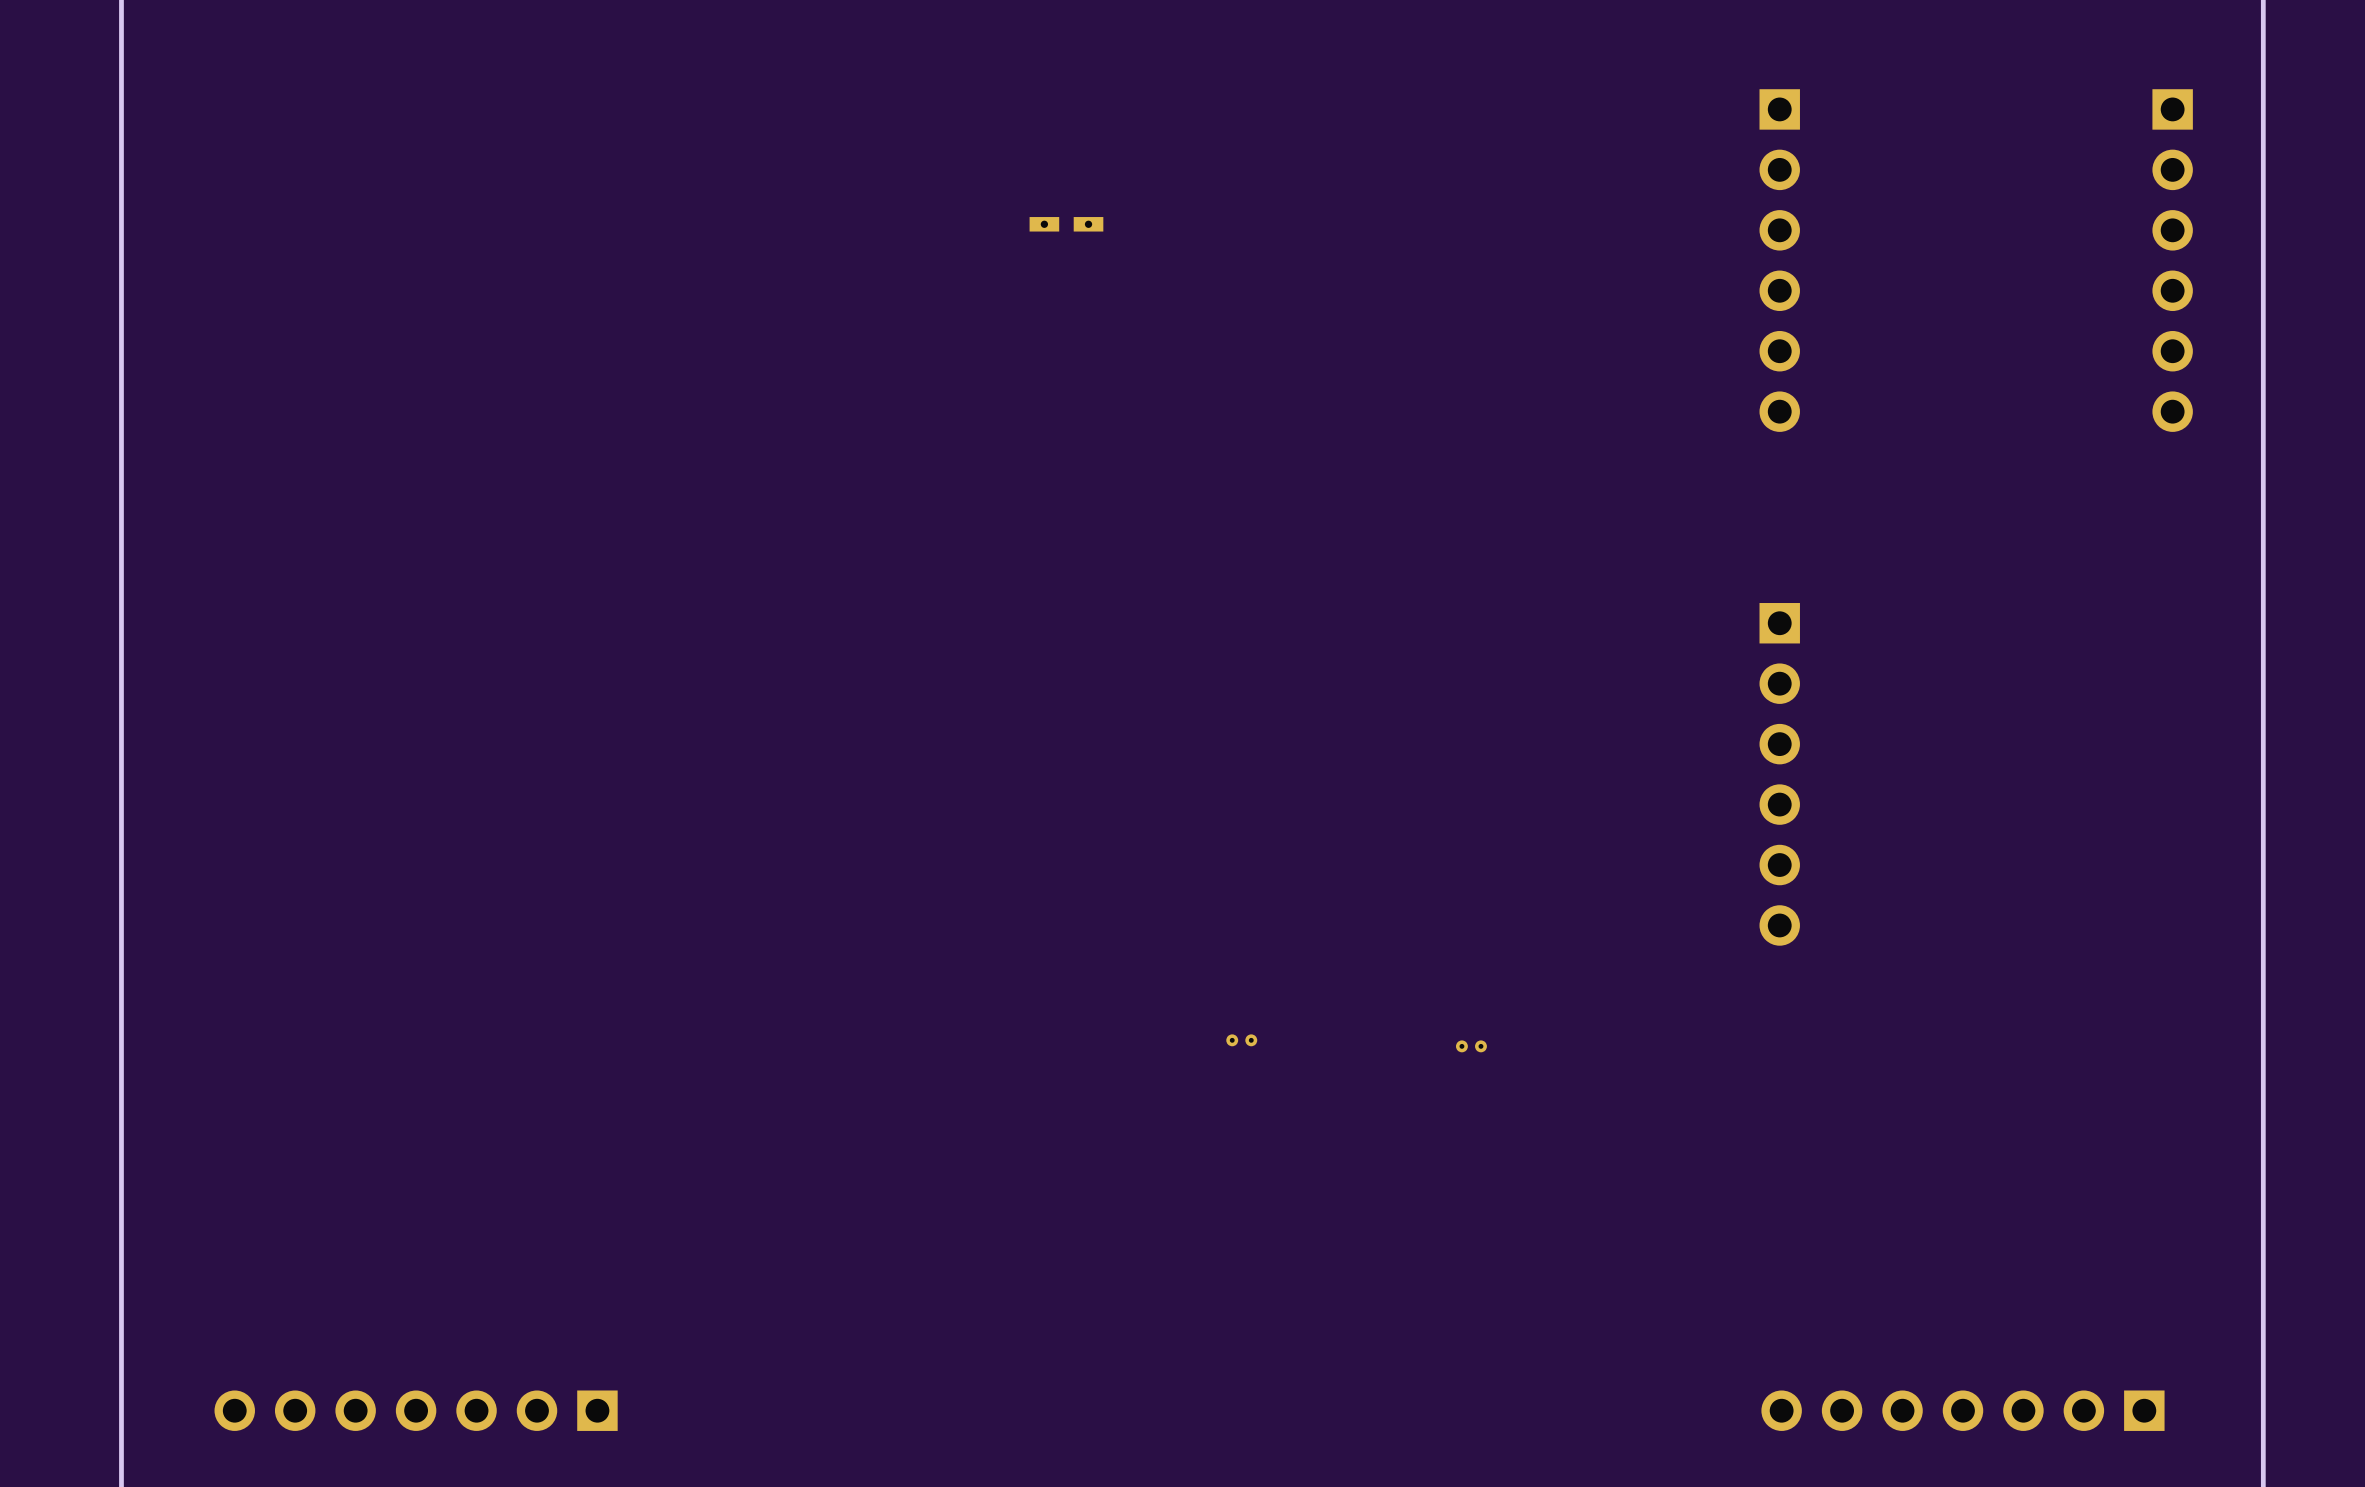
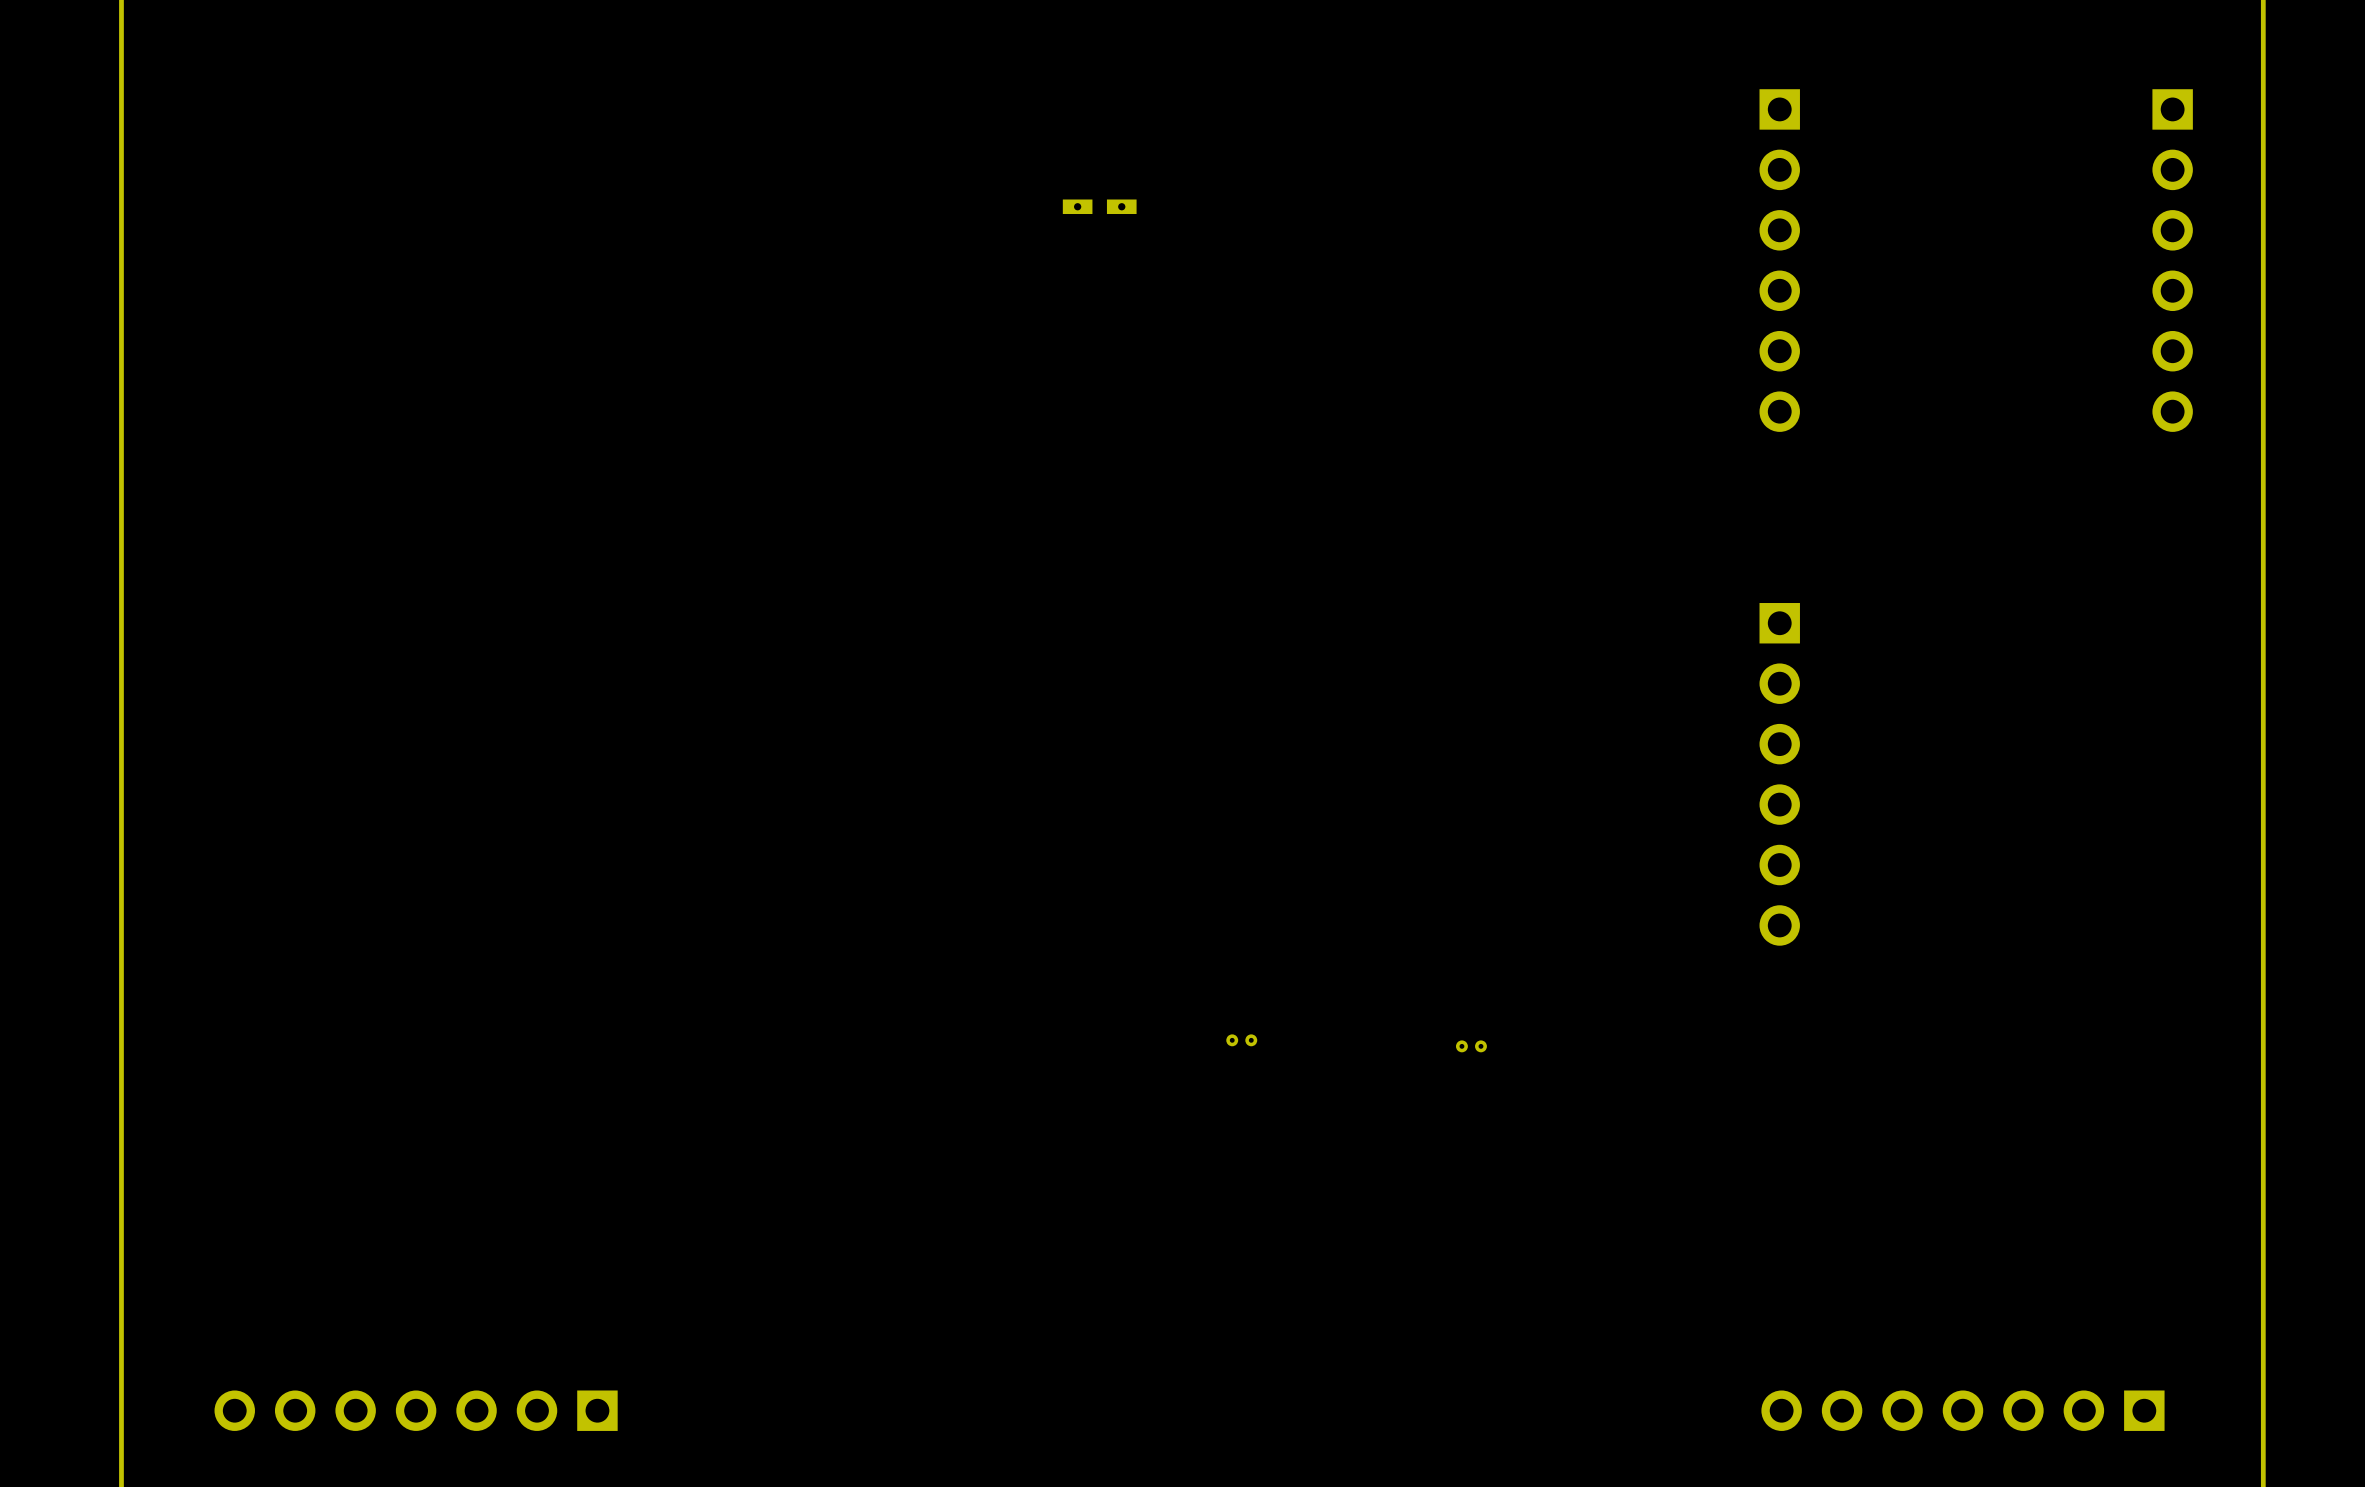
part position: (1066, 224) -> (1099, 206)

